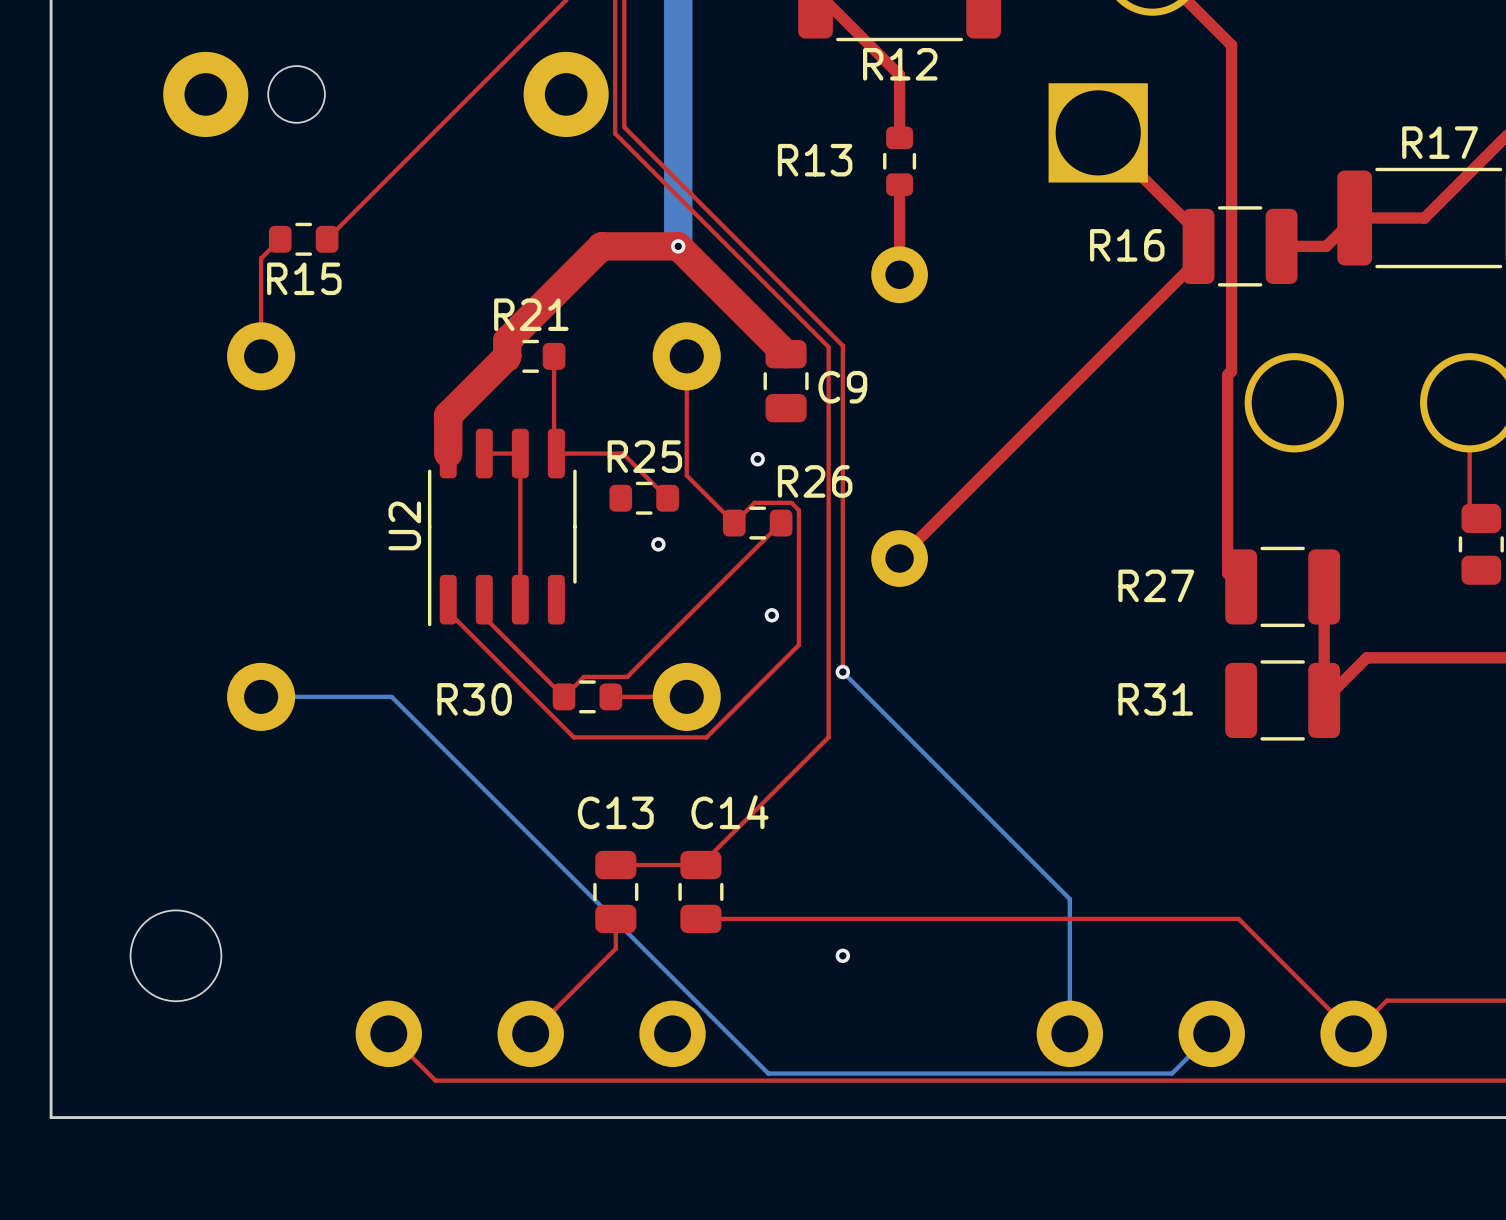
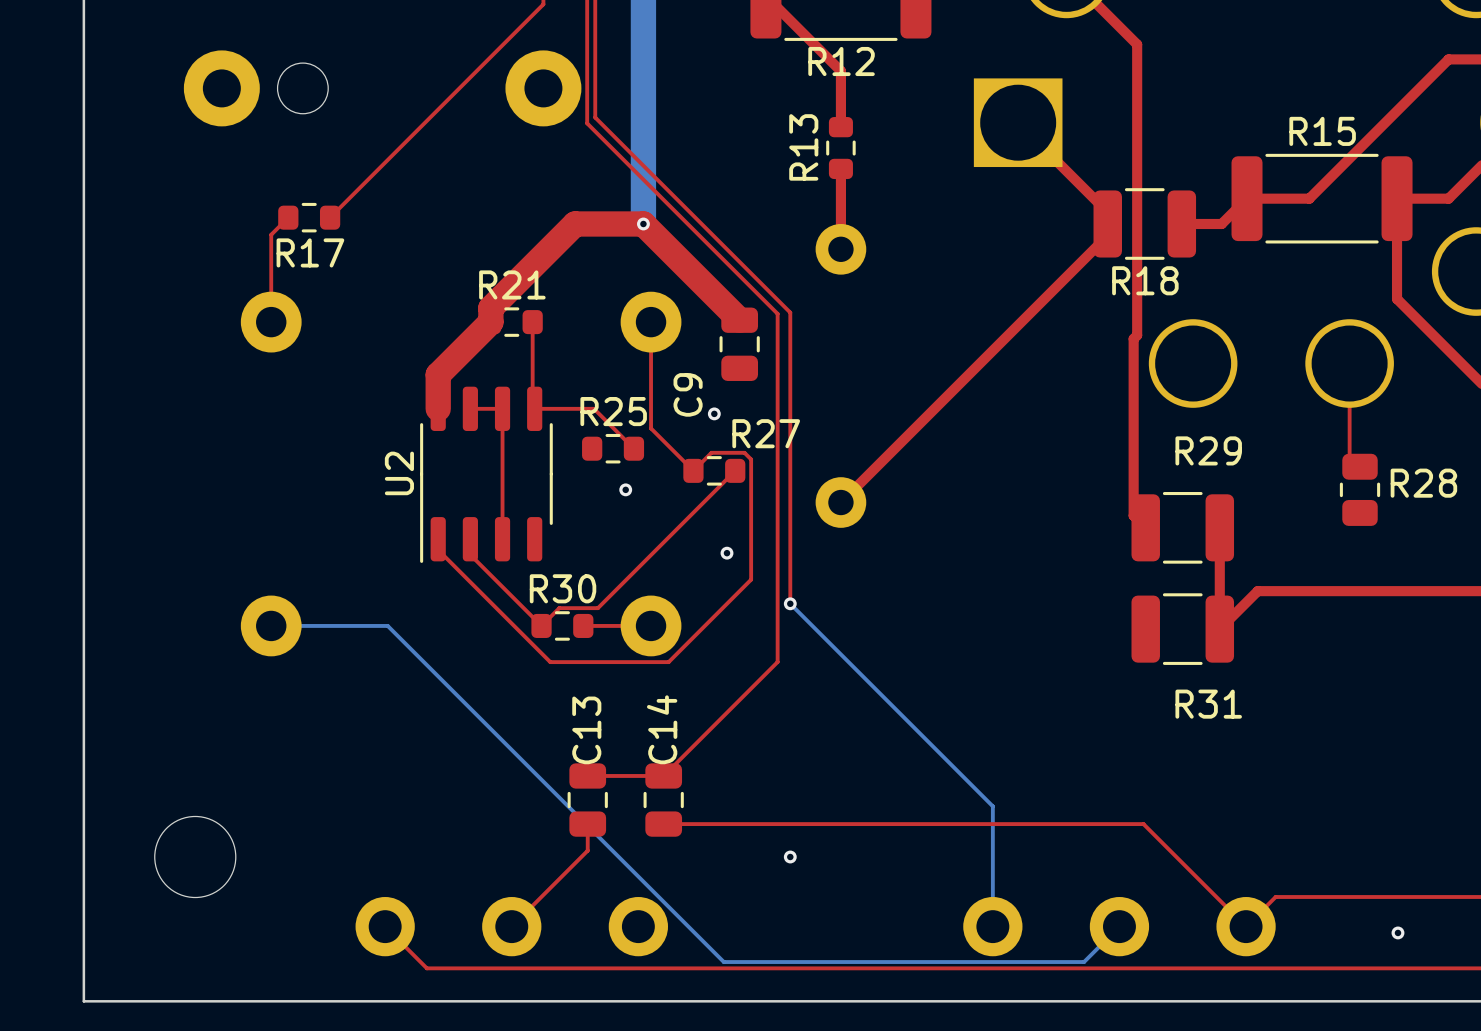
R17 name: R17 (1440, 142) -> R15 (1322, 131)
R13 name rotation: 0° (815, 160) -> 90° counterclockwise (803, 147)
R16 name: R16 (1127, 245) -> R18 (1145, 280)
R15 name: R15 (304, 278) -> R17 (310, 252)
C9 name rotation: 0° (842, 387) -> 90° counterclockwise (688, 394)
C9 name position: C9 (842, 387) -> C9 (688, 394)
R26 name: R26 (815, 481) -> R27 (766, 433)
R27 name: R27 (1156, 585) -> R29 (1208, 450)
R30 name position: R30 (474, 699) -> R30 (563, 588)
R31 name position: R31 (1155, 699) -> R31 (1208, 704)
C13 name rotation: 0° (615, 812) -> 90° counterclockwise (586, 730)
C14 name rotation: 0° (729, 812) -> 90° counterclockwise (662, 729)

